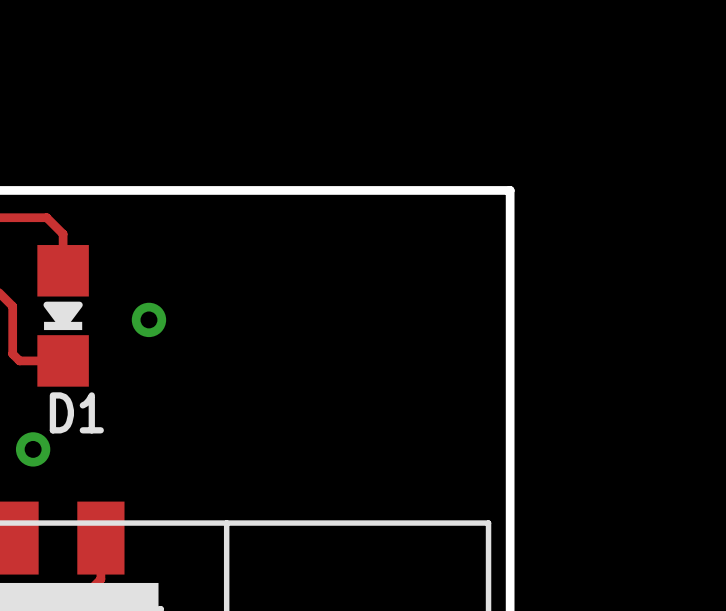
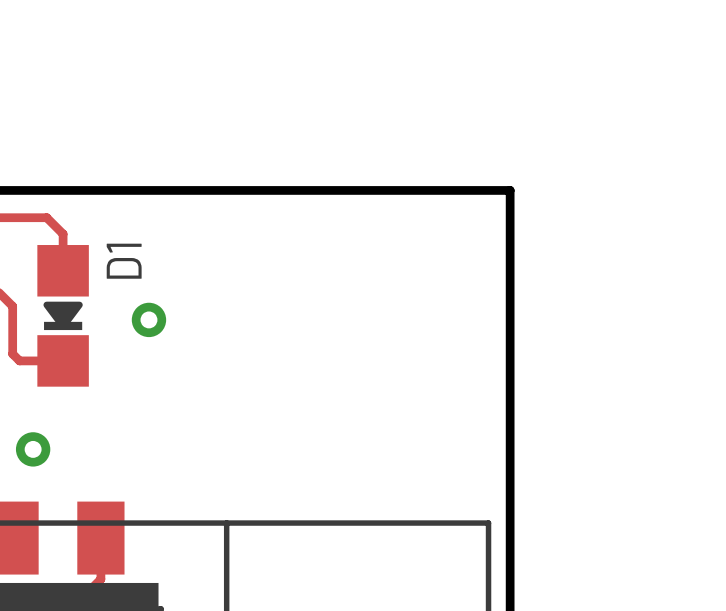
D1 name rotation: 0° (76, 412) -> 90° counterclockwise (124, 261)
D1 name position: D1 (76, 412) -> D1 (124, 261)

